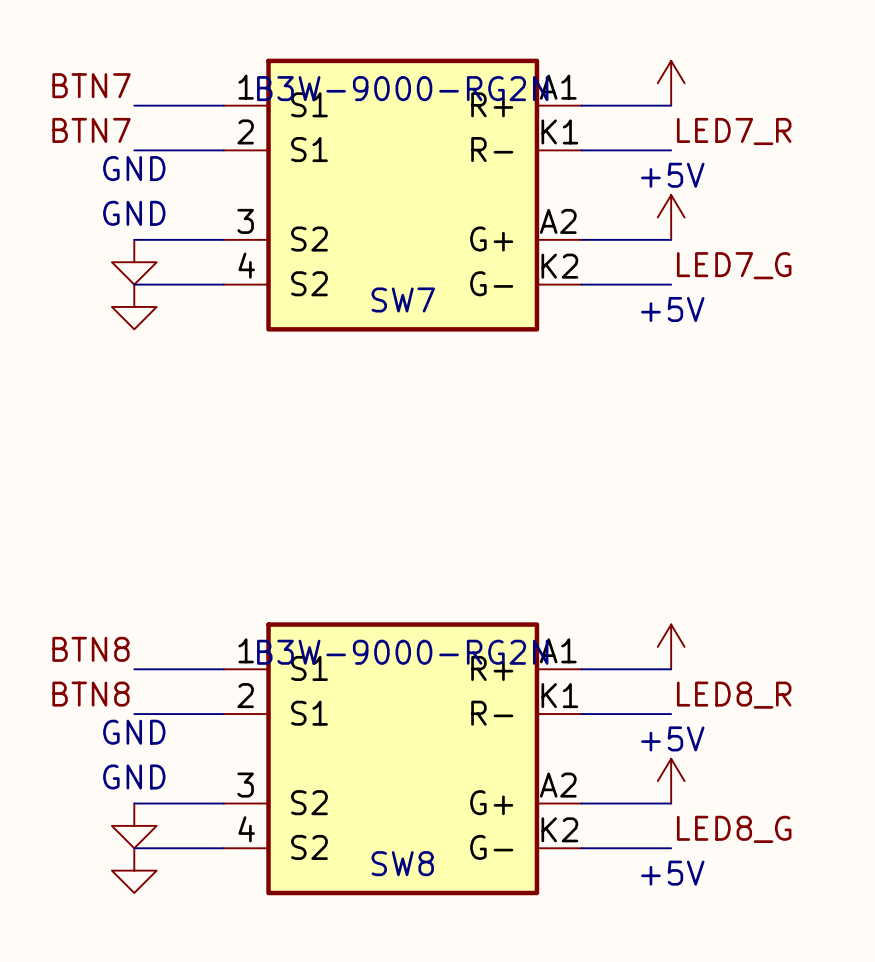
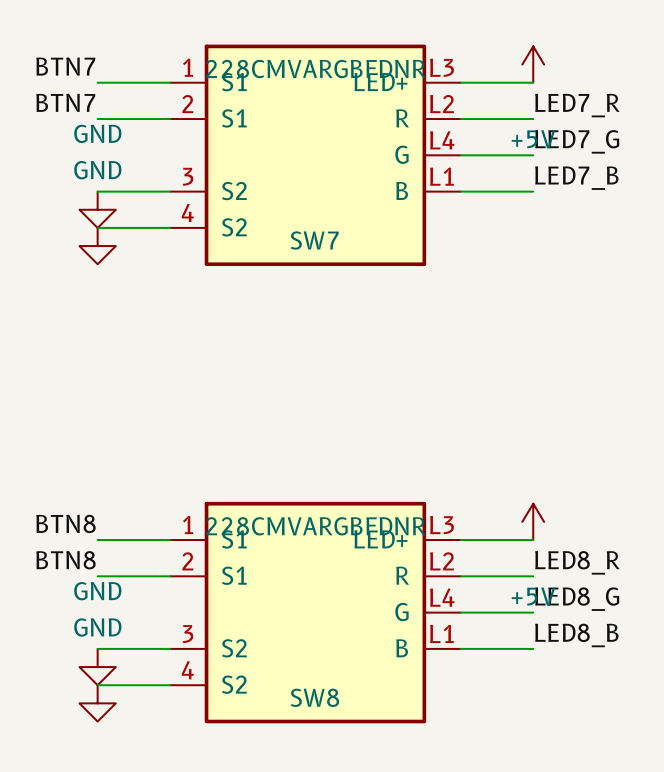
SW7 symbol: [223, 58, 582, 332] -> [170, 44, 461, 267]
SW7 value: B3W-9000-RG2N (402, 88) -> 228CMVARGBFDNR (315, 69)
power symbol: +5V (671, 217) -> none
label: none -> LED7_B (576, 178)
label position: LED7_G (734, 265) -> LED7_G (577, 141)
wire: (581, 284) (671, 284) -> (460, 155) (533, 155)
SW8 symbol: [223, 622, 582, 896] -> [170, 501, 461, 724]
SW8 value: B3W-9000-RG2N (402, 652) -> 228CMVARGBFDNR (315, 526)
power symbol: +5V (671, 781) -> none
label: none -> LED8_B (576, 635)
label position: LED8_G (734, 829) -> LED8_G (577, 599)
wire: (581, 848) (671, 848) -> (460, 612) (533, 612)

